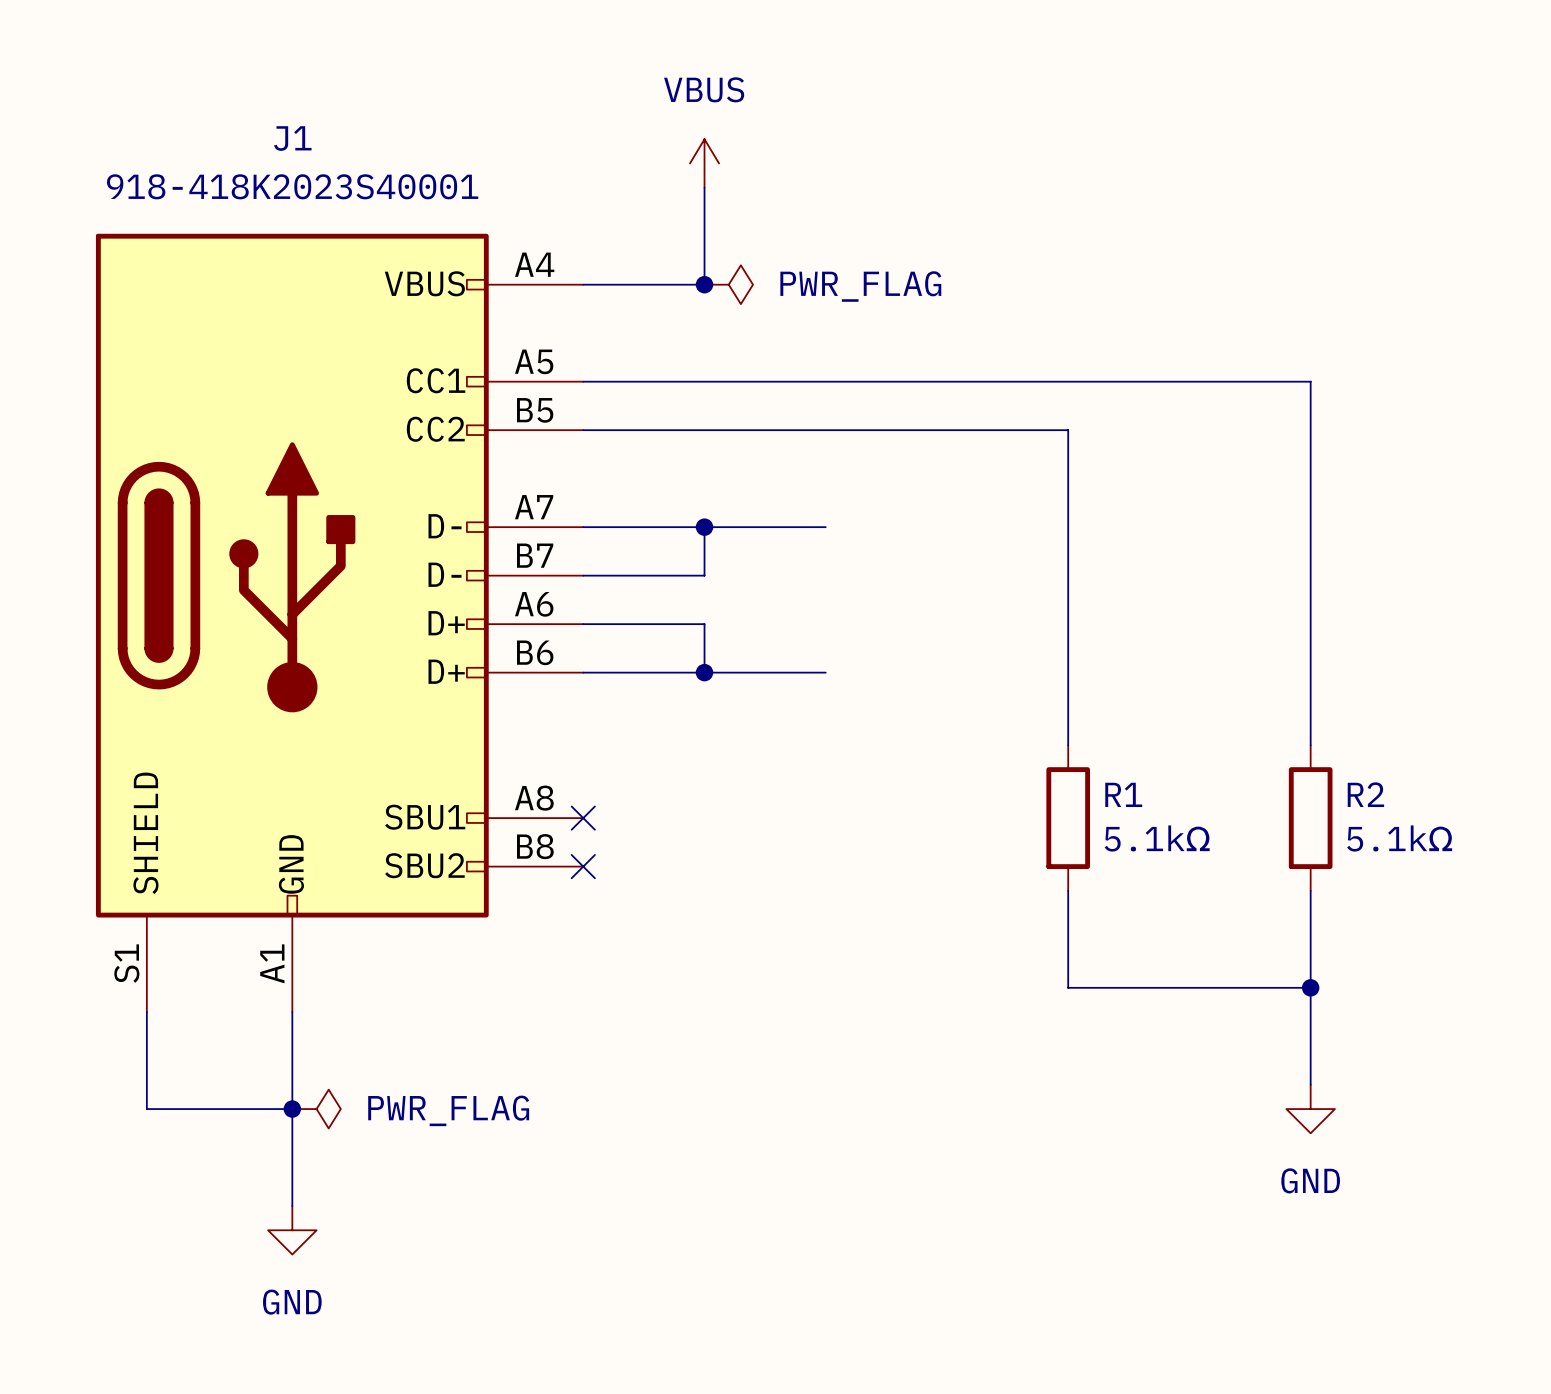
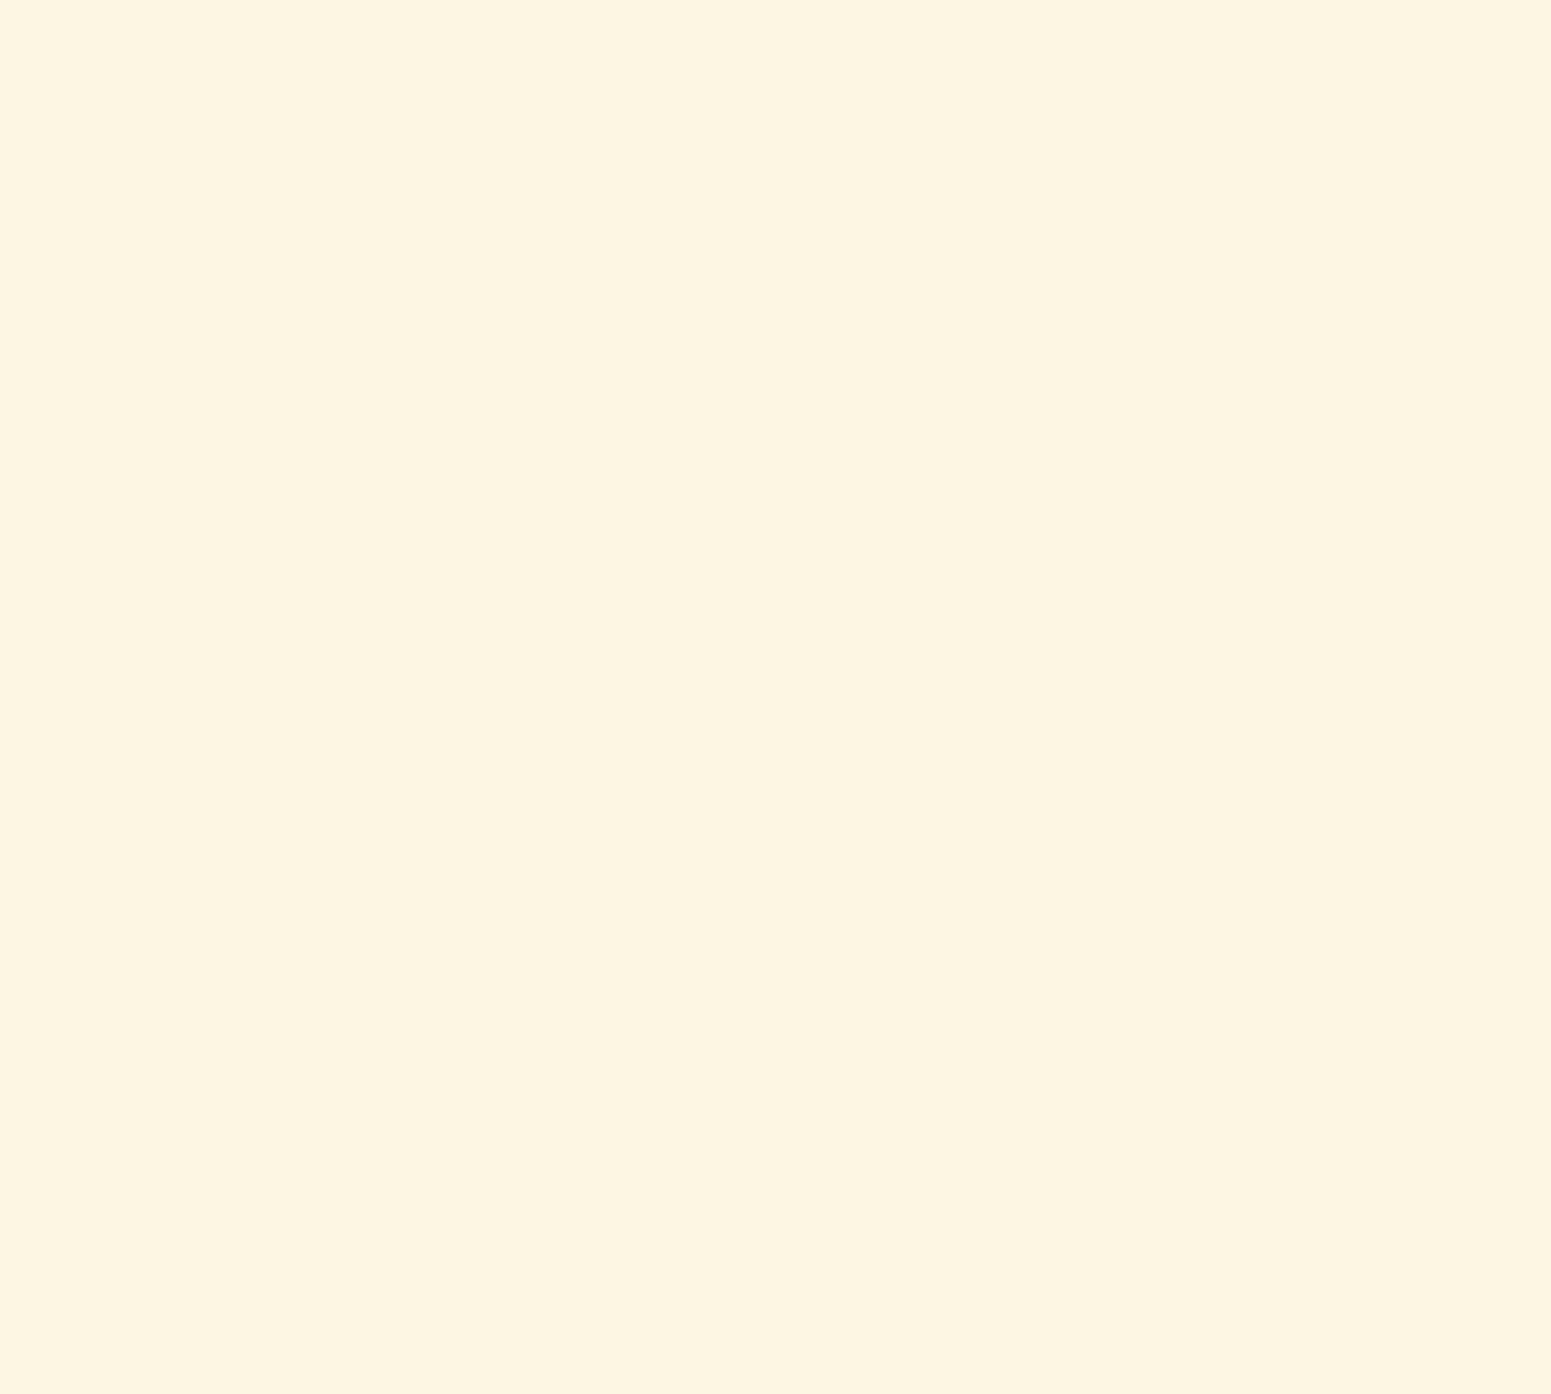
power symbol: VBUS (704, 163) -> none
wire: (704, 187) (704, 284) (583, 284) -> none
junction: (704, 284) -> none
power symbol: PWR_FLAG (728, 284) -> none
wire: (583, 381) (1310, 381) (1310, 745) -> none
wire: (583, 430) (1068, 430) (1068, 745) -> none
wire: (583, 527) (825, 527) -> none
wire: (704, 527) (704, 575) (583, 575) -> none
junction: (704, 527) -> none
J1: 918-418K2023S40001 (339, 622) -> none
wire: (583, 624) (704, 624) (704, 672) -> none
wire: (583, 672) (825, 672) -> none
junction: (704, 672) -> none
no-connect mark: (583, 818) -> none
R1: 5.1kΩ (1068, 818) -> none
R2: 5.1kΩ (1310, 818) -> none
no-connect mark: (583, 866) -> none
wire: (1068, 890) (1068, 987) (1310, 987) -> none
wire: (1310, 890) (1310, 1084) -> none
junction: (1310, 987) -> none
wire: (146, 1012) (146, 1109) (292, 1109) -> none
wire: (292, 1012) (292, 1206) -> none
junction: (292, 1109) -> none
power symbol: PWR_FLAG (316, 1109) -> none
power symbol: GND (1310, 1109) -> none
power symbol: GND (292, 1230) -> none

